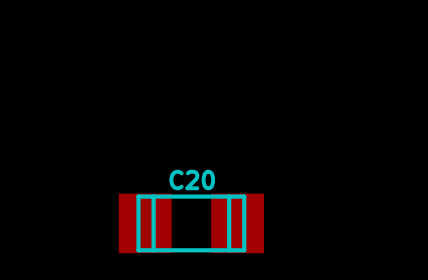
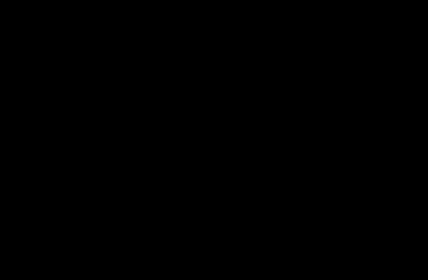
C20: (191, 223) -> none

